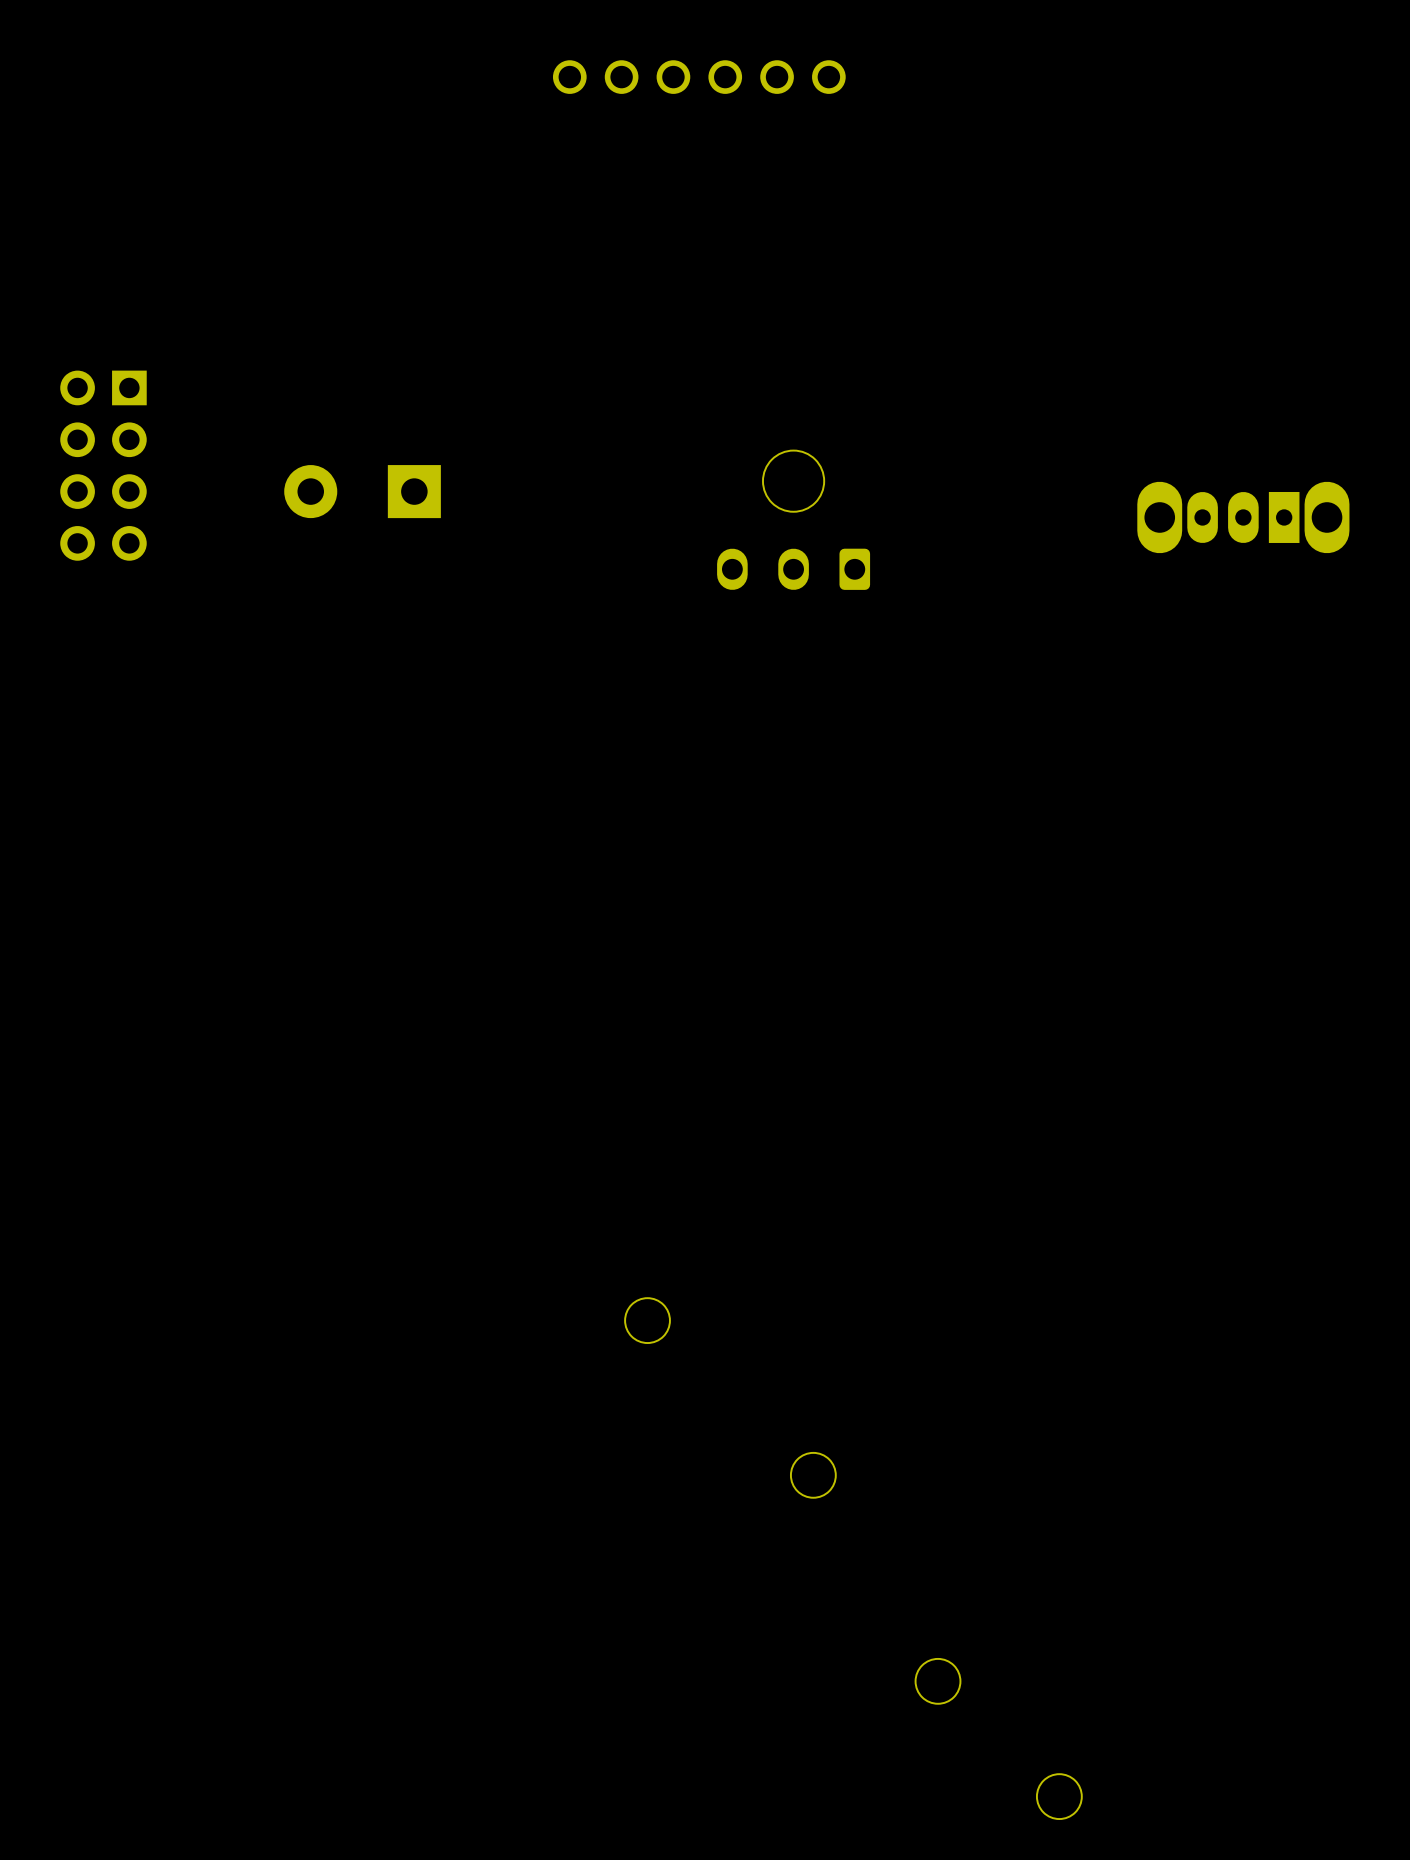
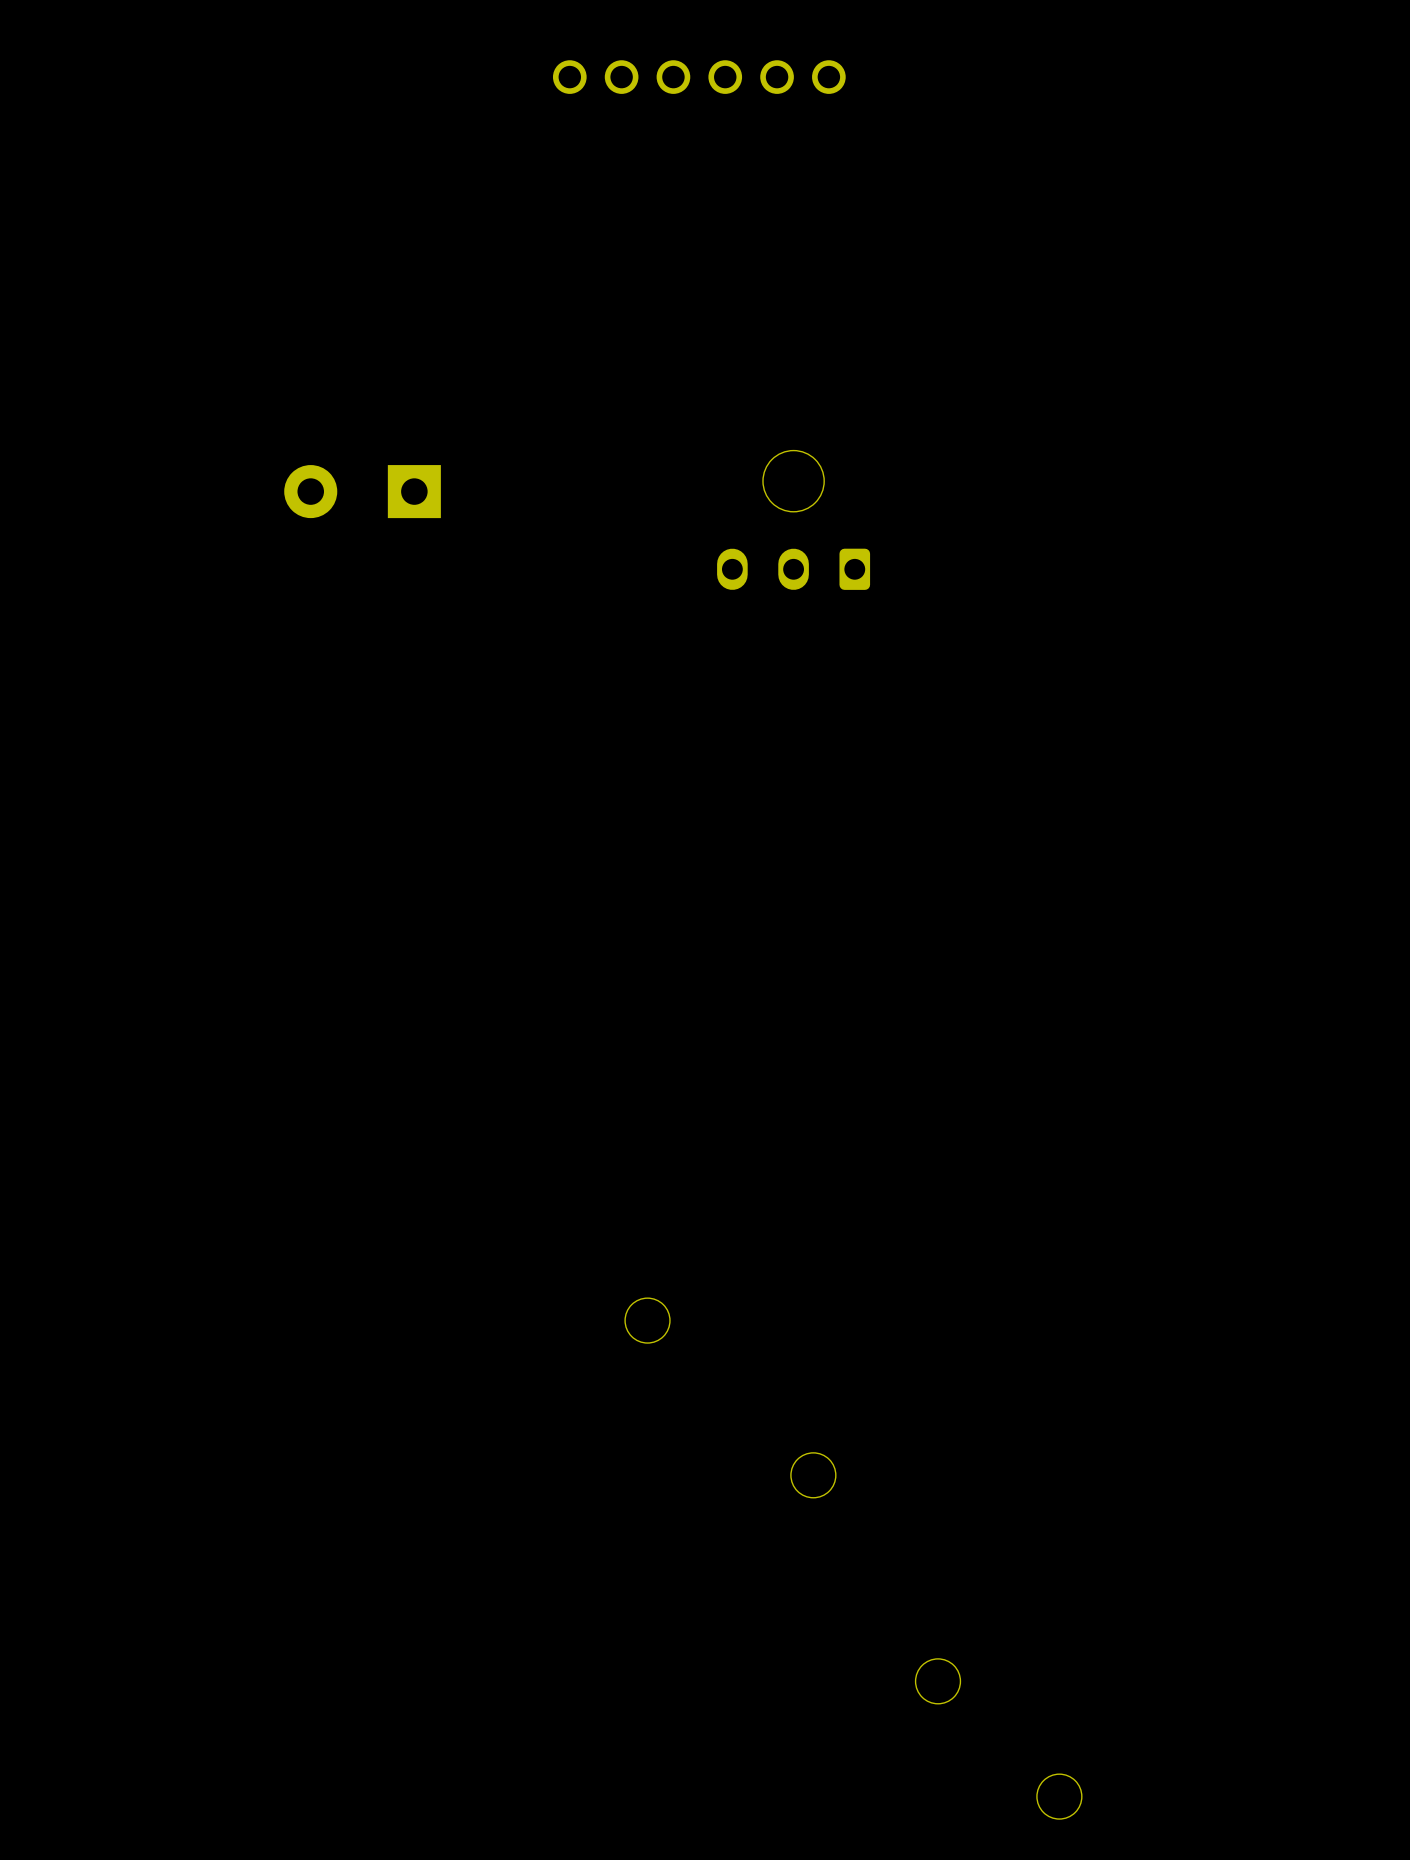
part: (103, 465) -> none
part: (1243, 517) -> none

